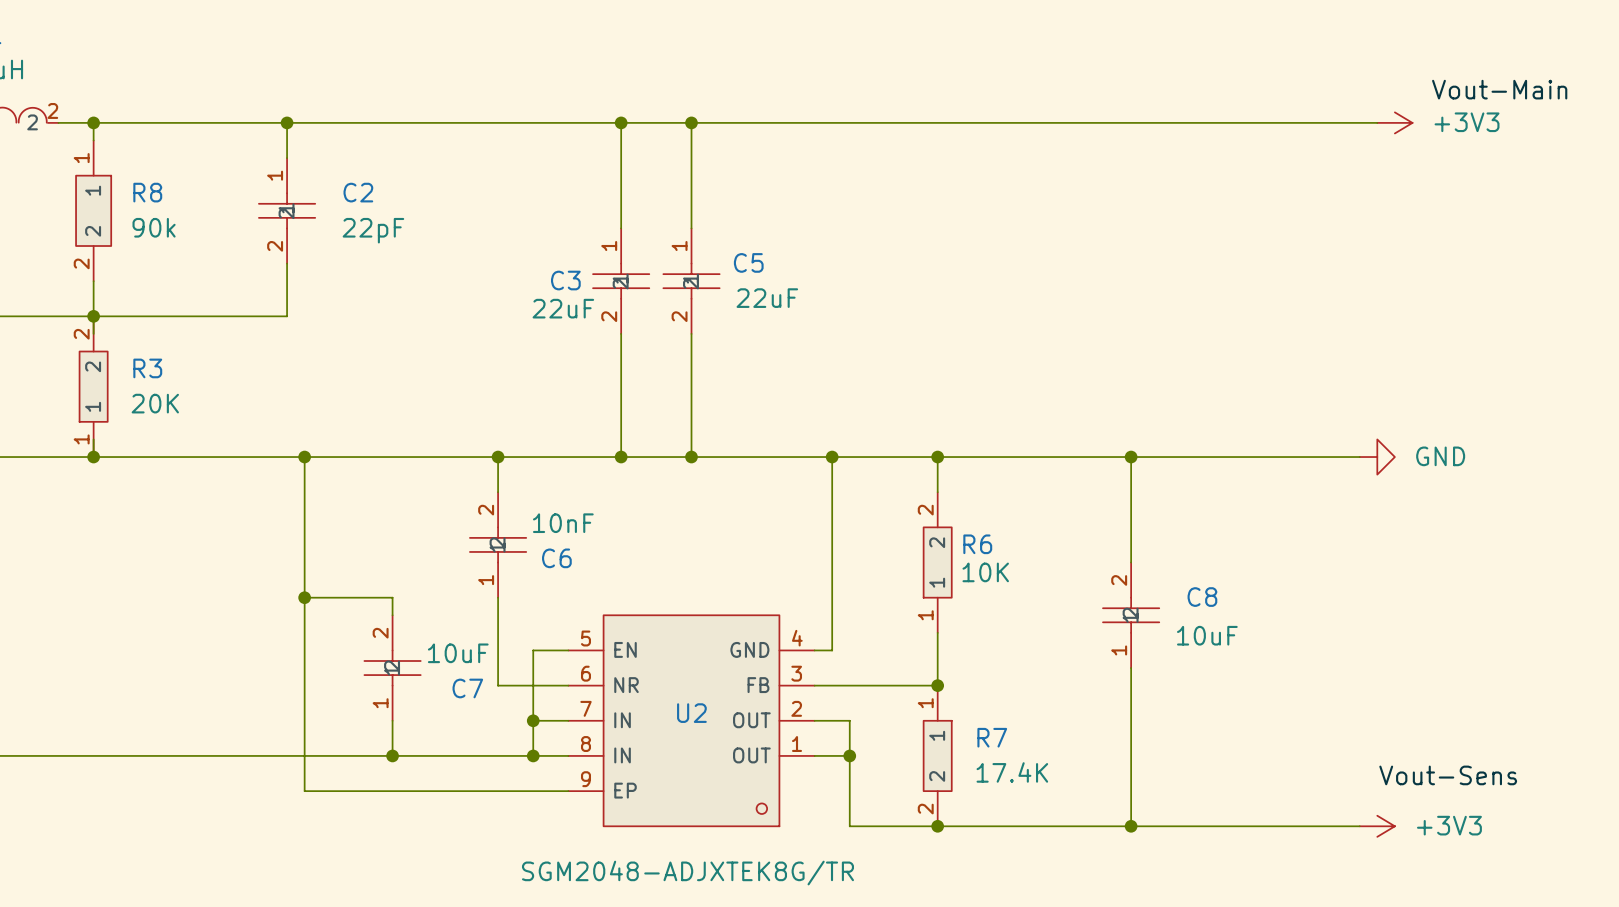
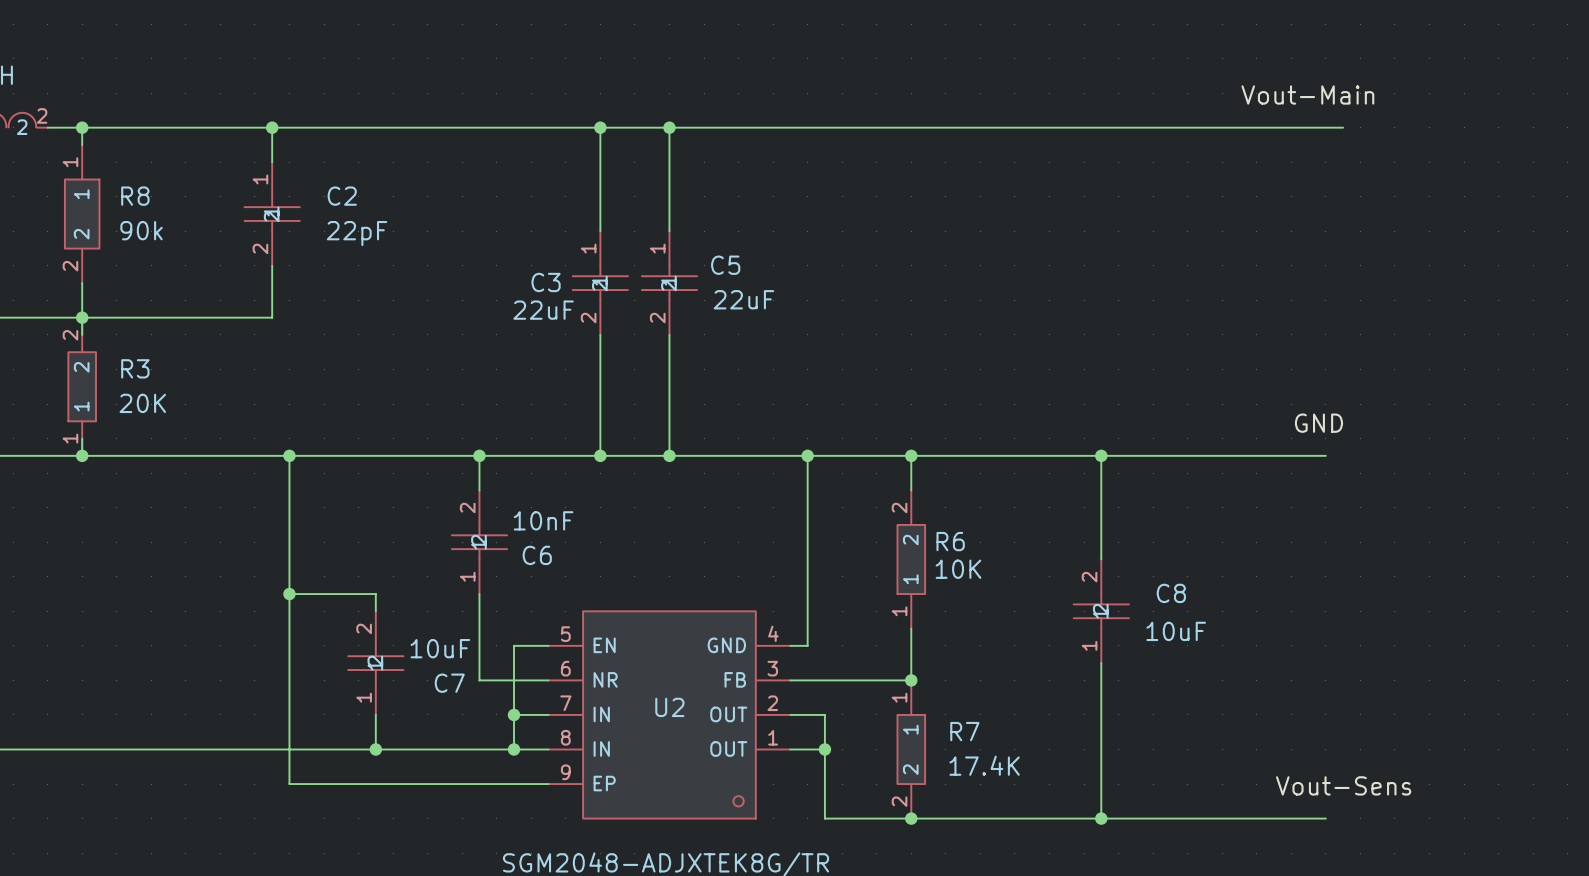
label position: Vout-Main (1499, 89) -> Vout-Main (1307, 94)
power symbol: +3V3 (1394, 122) -> none
label: none -> GND (1318, 423)
power symbol: GND (1377, 457) -> none
label position: Vout-Sens (1448, 775) -> Vout-Sens (1343, 785)
power symbol: +3V3 (1377, 826) -> none

